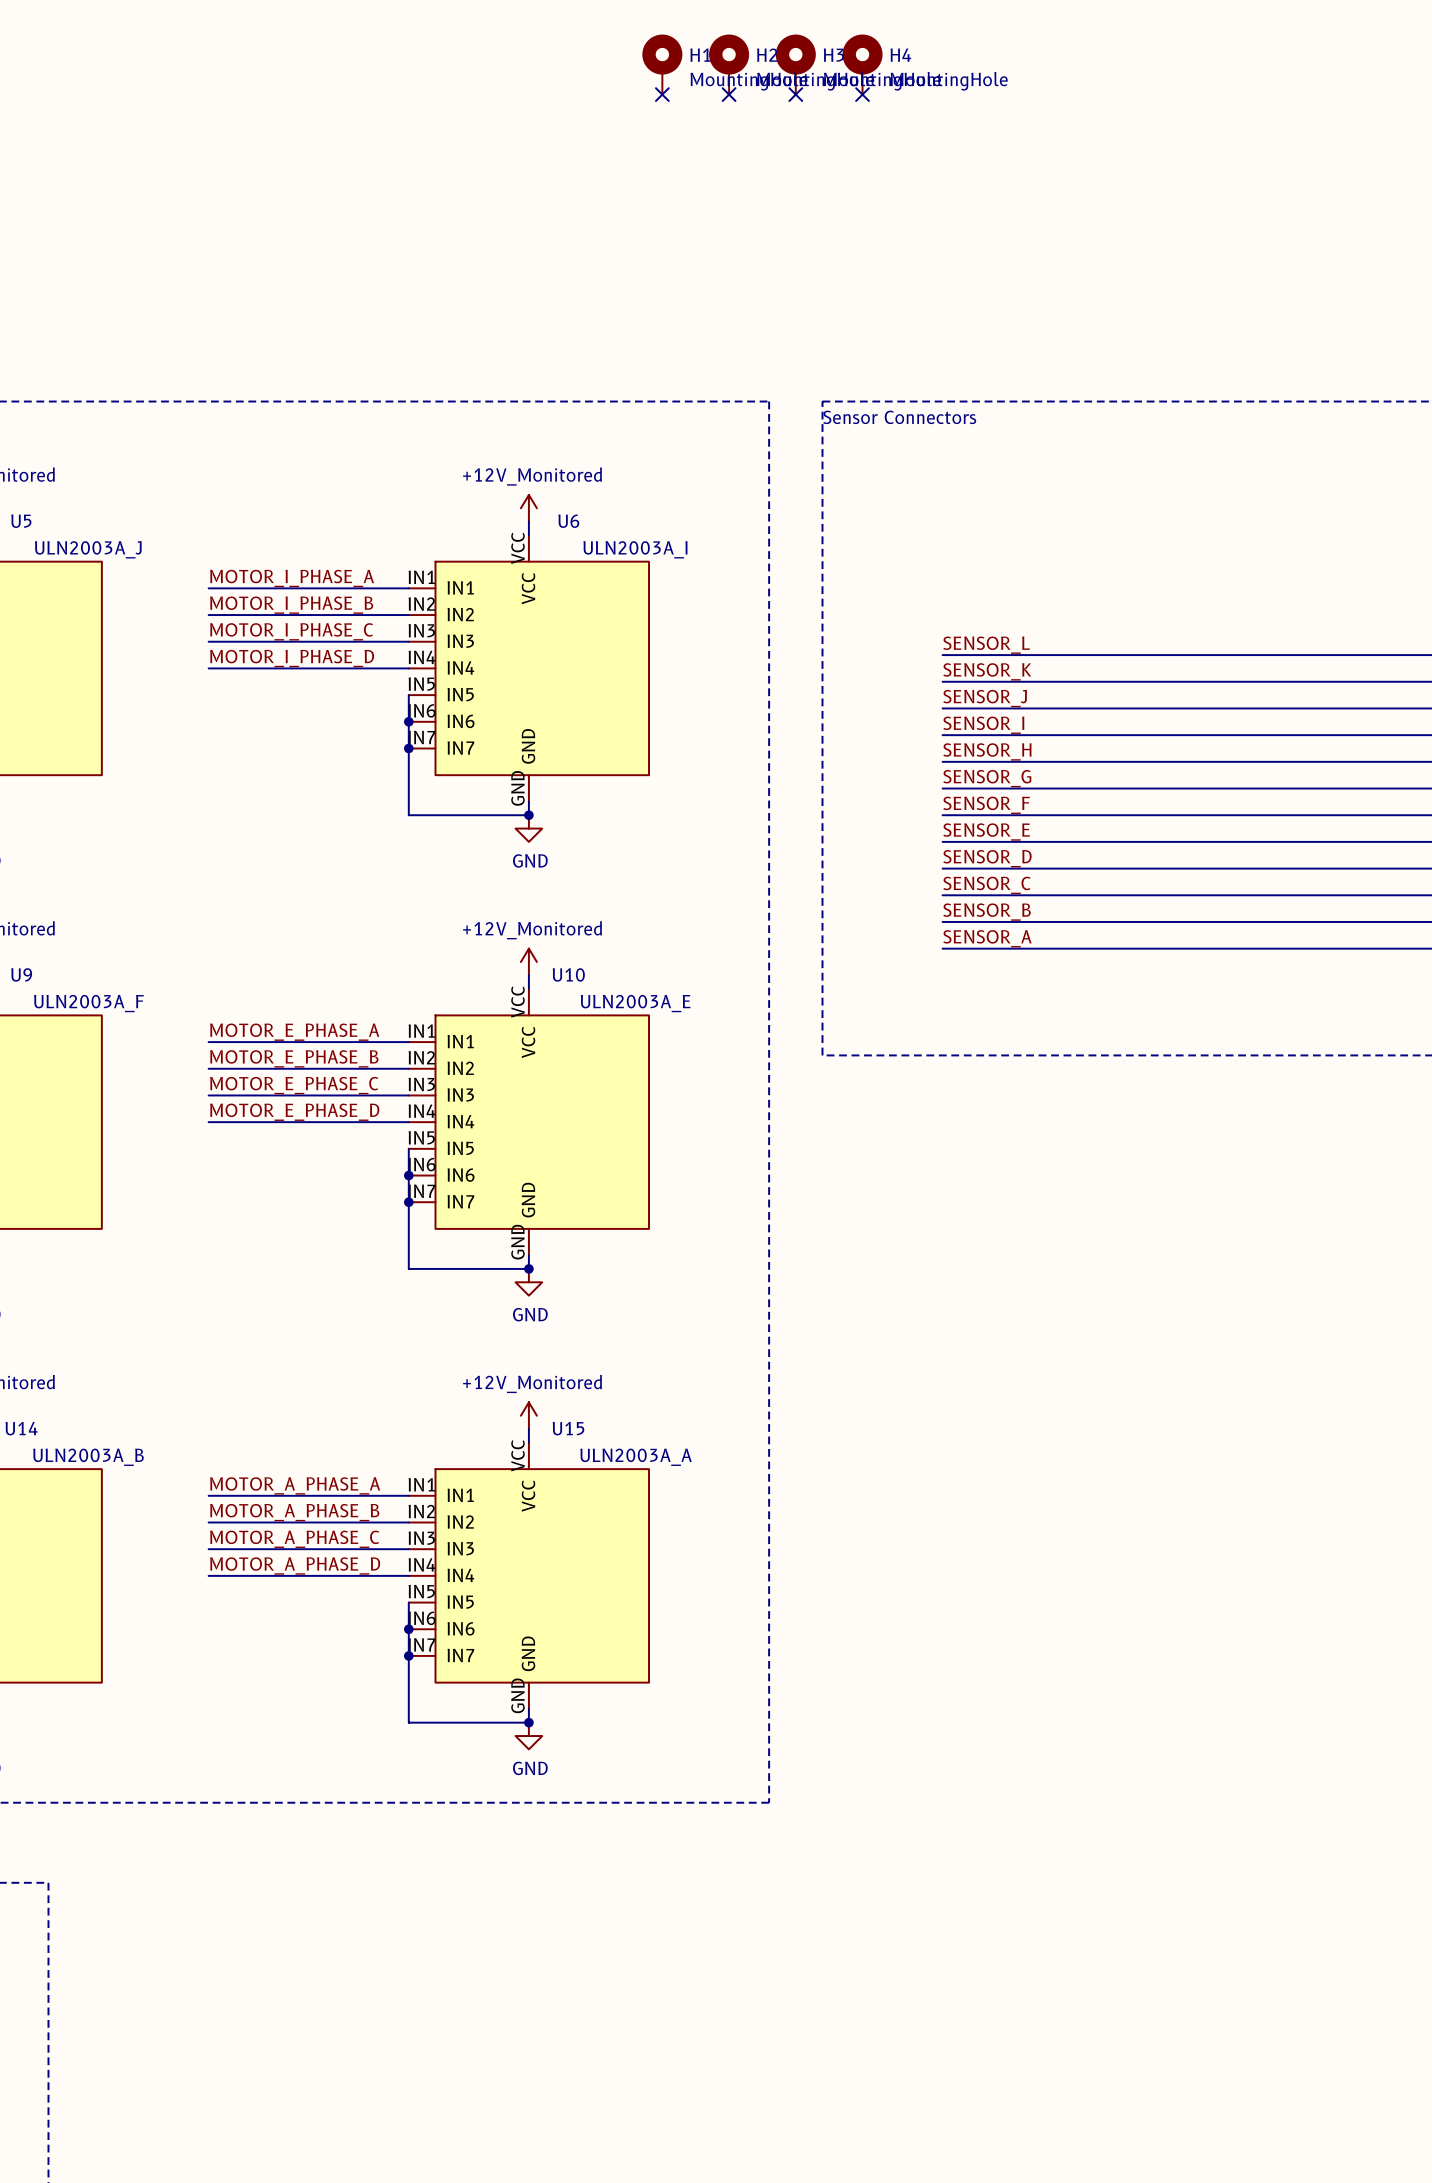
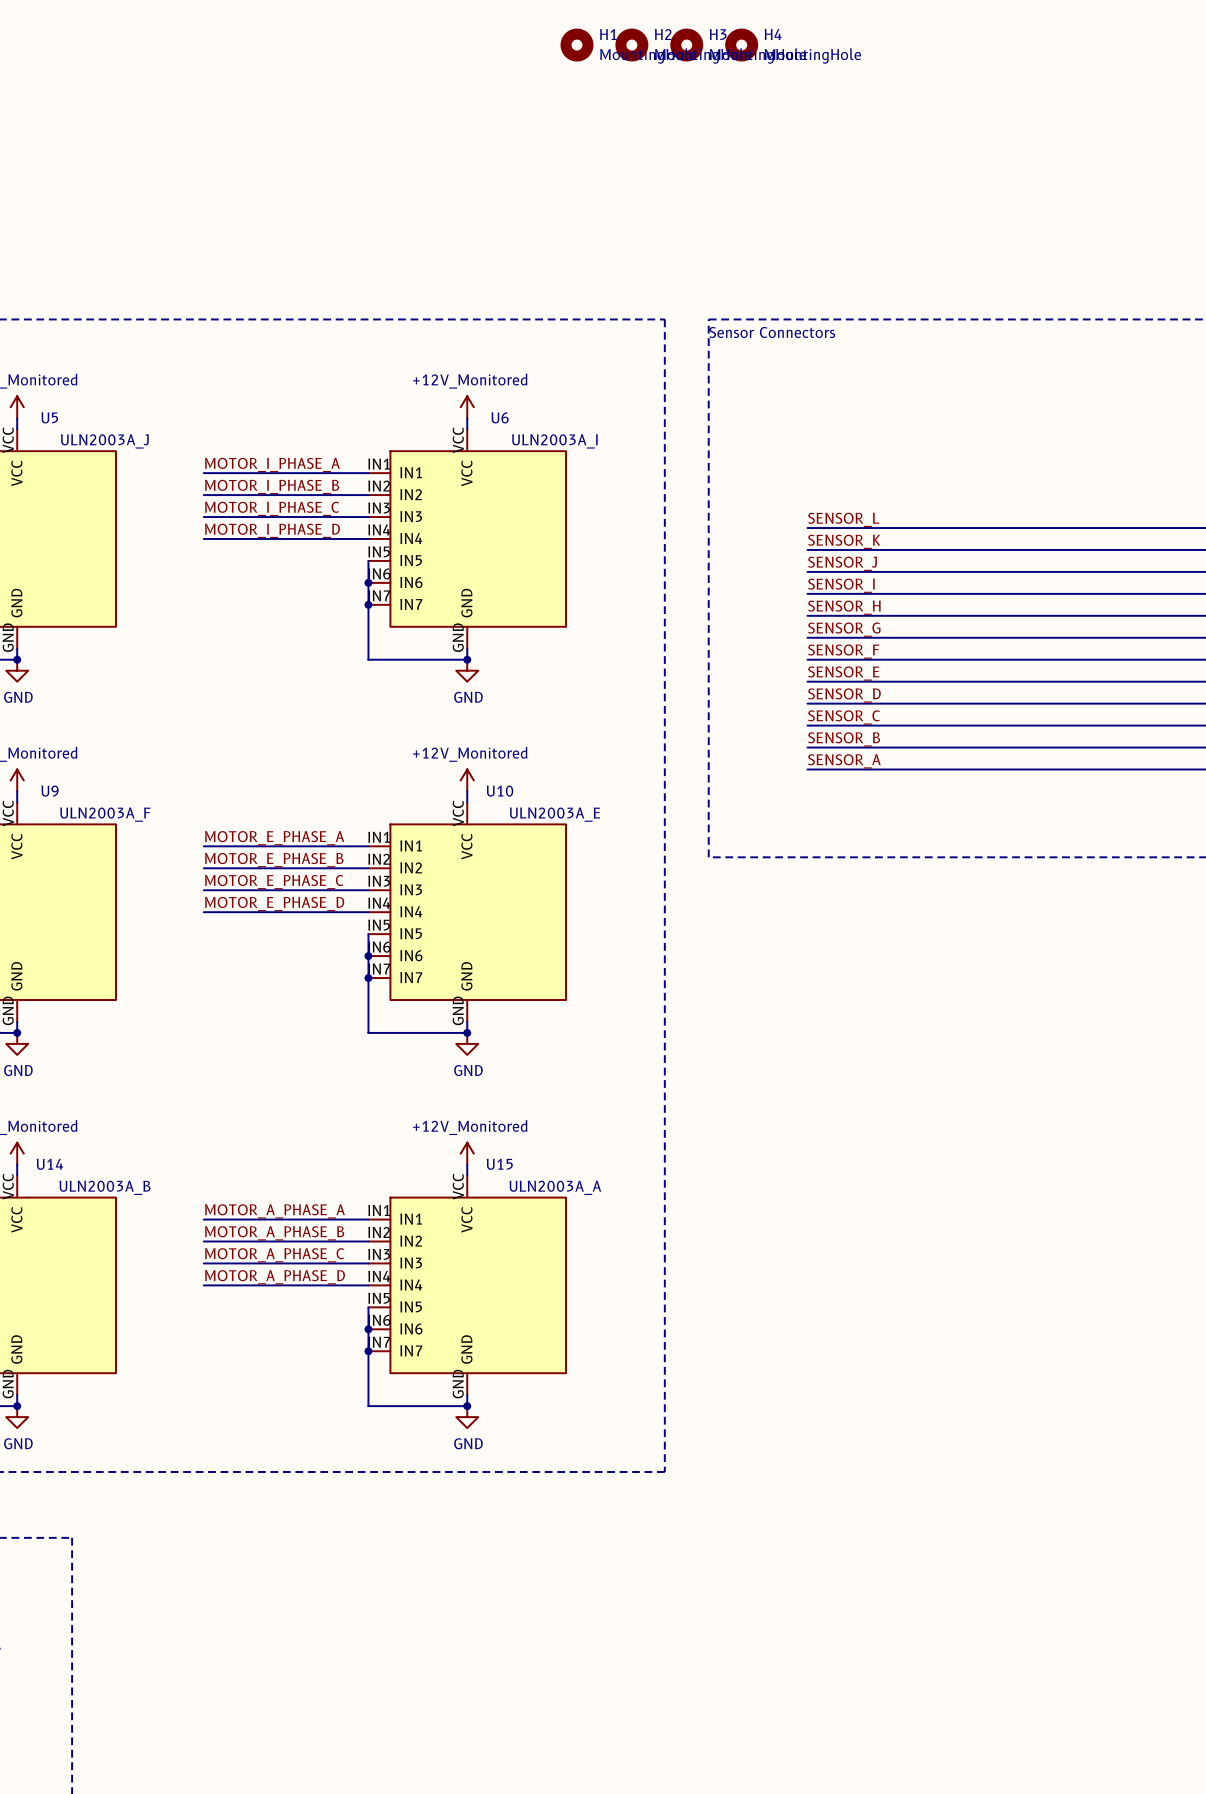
H1 symbol: [642, 34, 683, 95] -> [560, 28, 594, 62]
H2 symbol: [709, 34, 750, 95] -> [615, 28, 649, 62]
H3 symbol: [775, 34, 816, 95] -> [670, 28, 704, 62]
H4 symbol: [842, 34, 883, 95] -> [725, 28, 759, 62]
no-connect mark: (662, 94) -> none
no-connect mark: (729, 94) -> none
no-connect mark: (795, 94) -> none
no-connect mark: (862, 94) -> none

